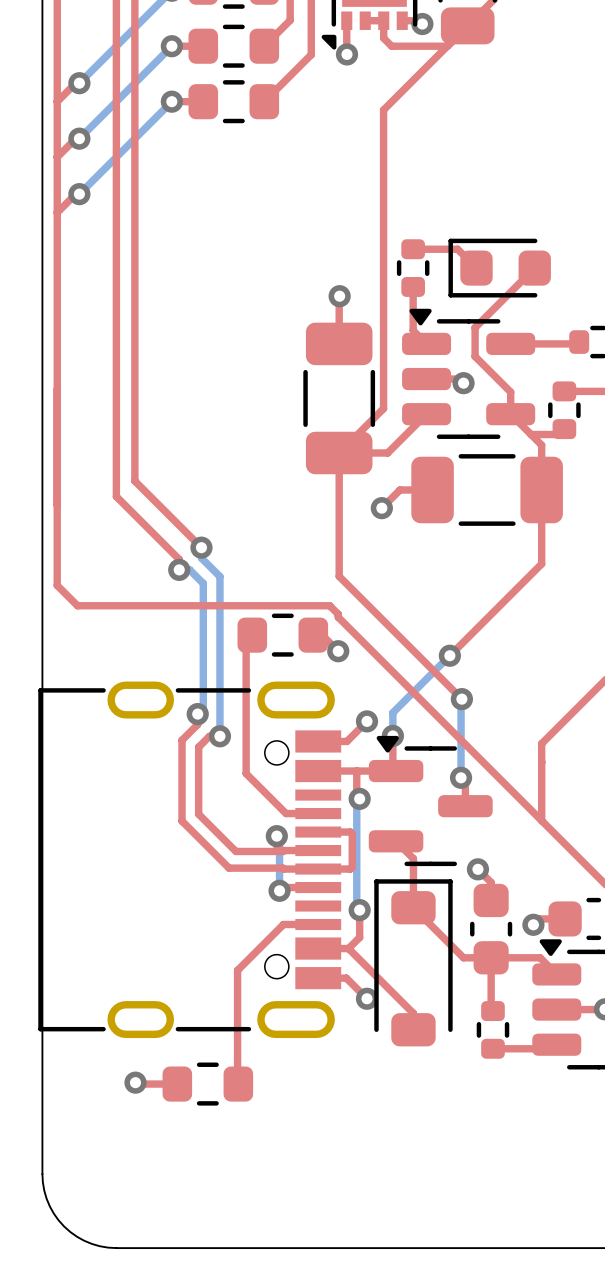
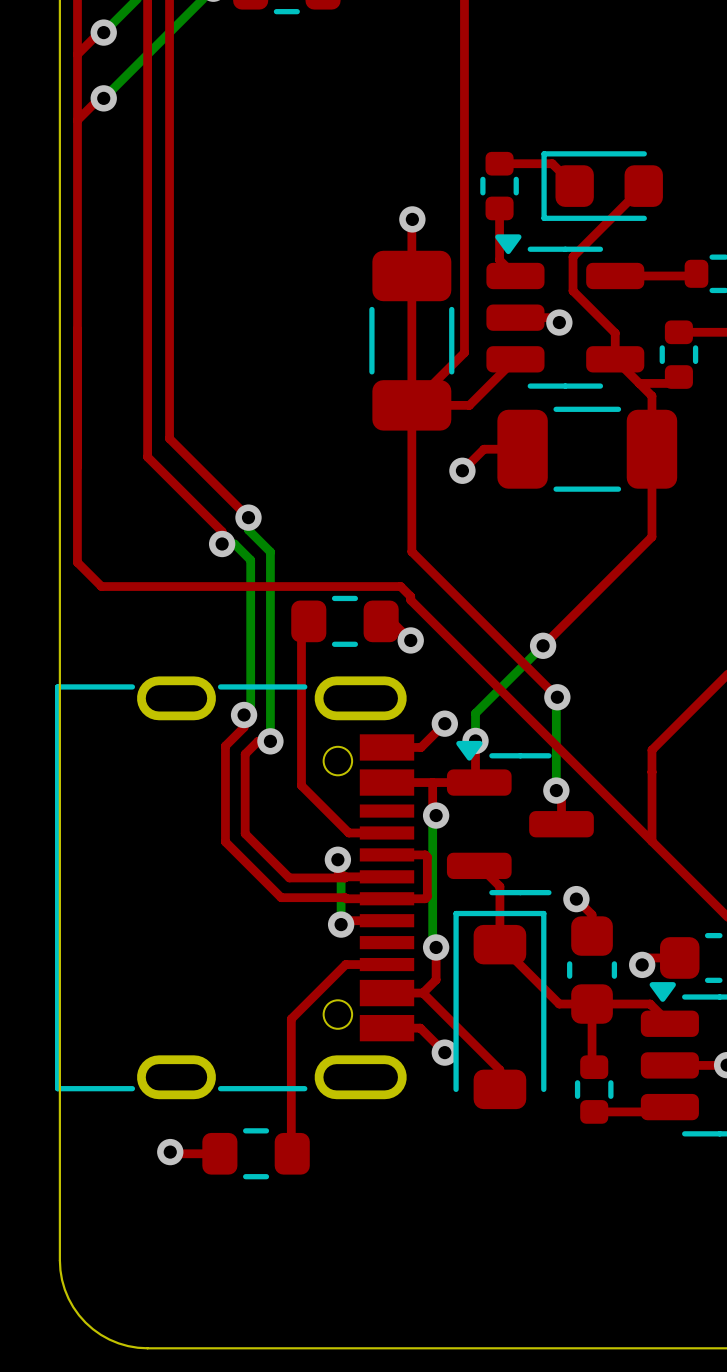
top track: none -> (411, 275) (411, 405)

